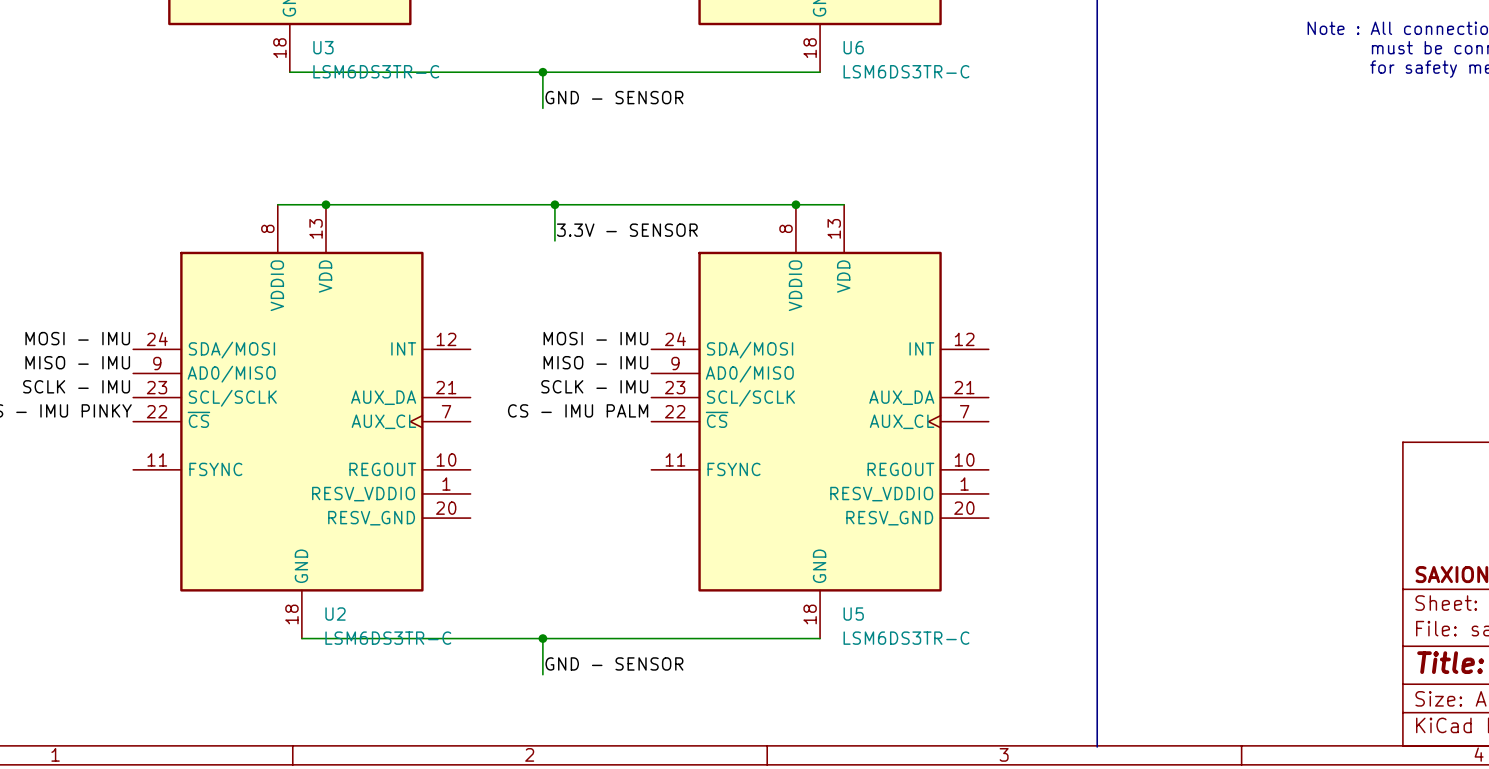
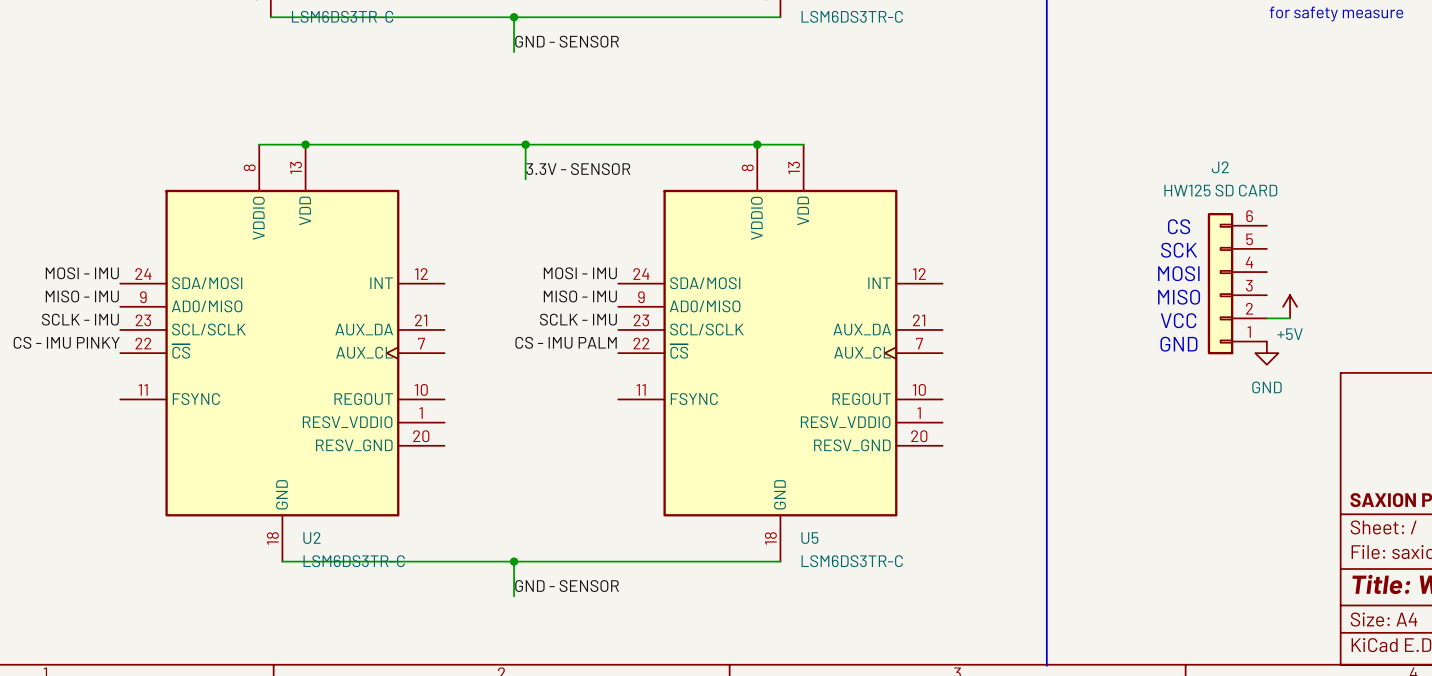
text: none -> CS (1179, 226)
text: none -> SCK (1179, 250)
text: none -> MOSI (1178, 273)
J2: none -> HW125 SD CARD (1237, 283)
text: none -> MISO (1179, 297)
power symbol: none -> +5V (1290, 306)
wire: none -> (1266, 318) (1290, 318)
text: none -> VCC (1178, 320)
text: none -> GND (1178, 344)
power symbol: none -> GND (1266, 353)

